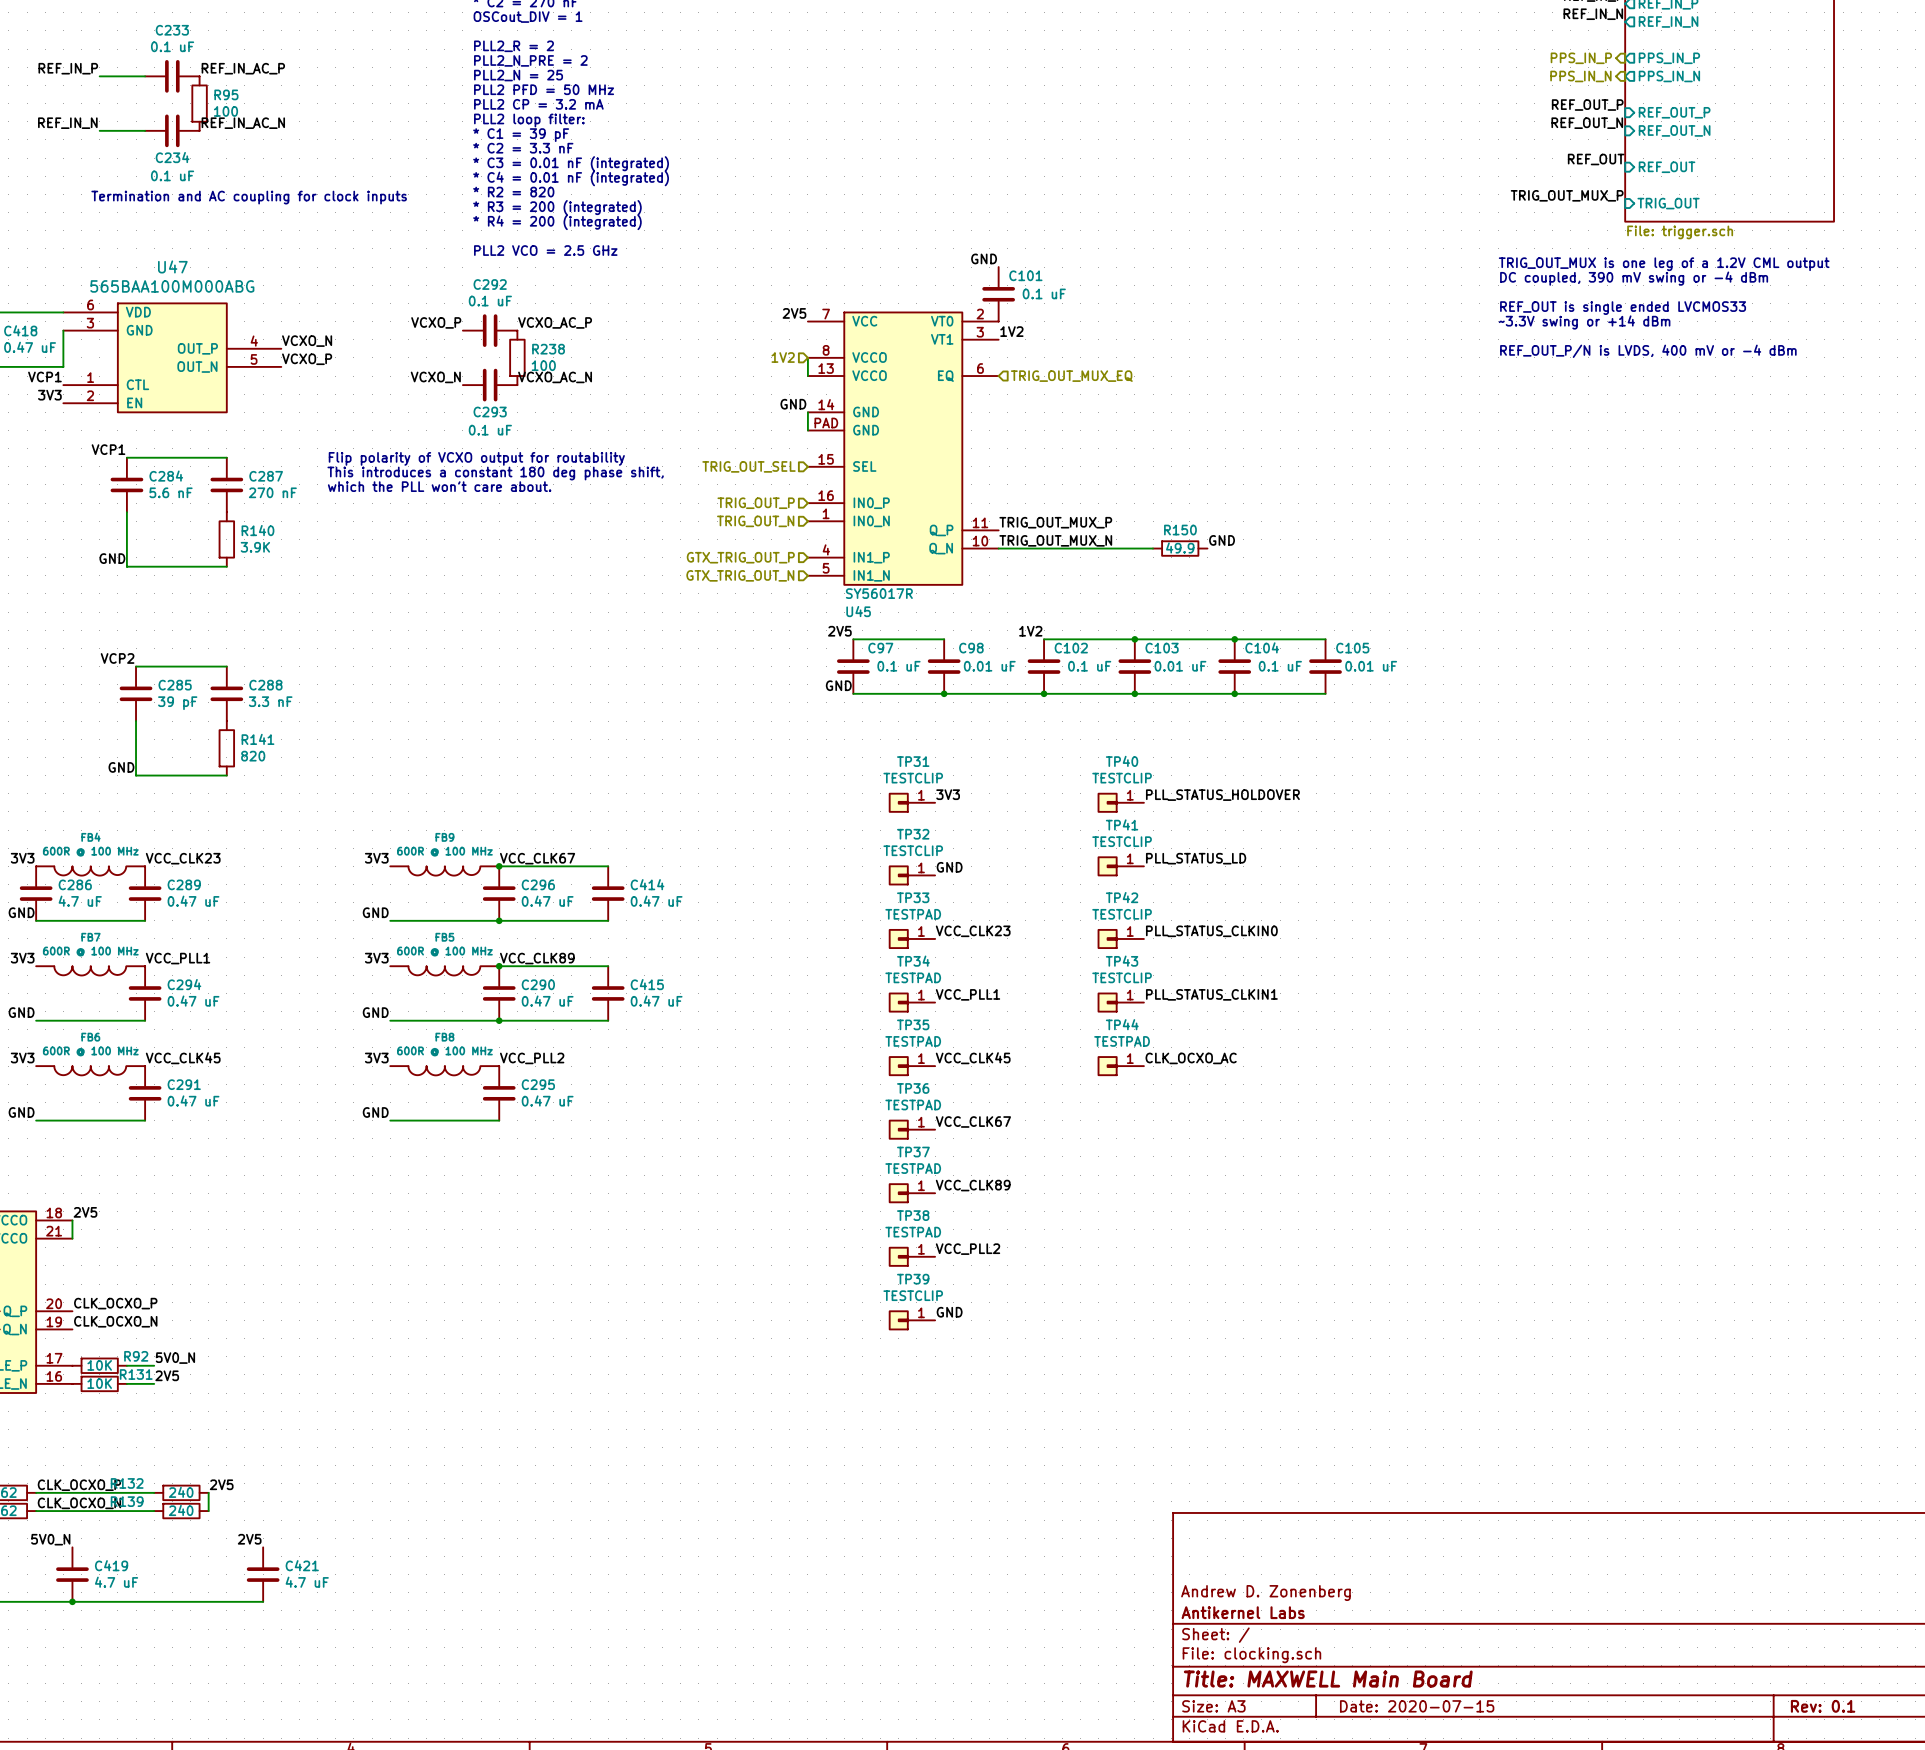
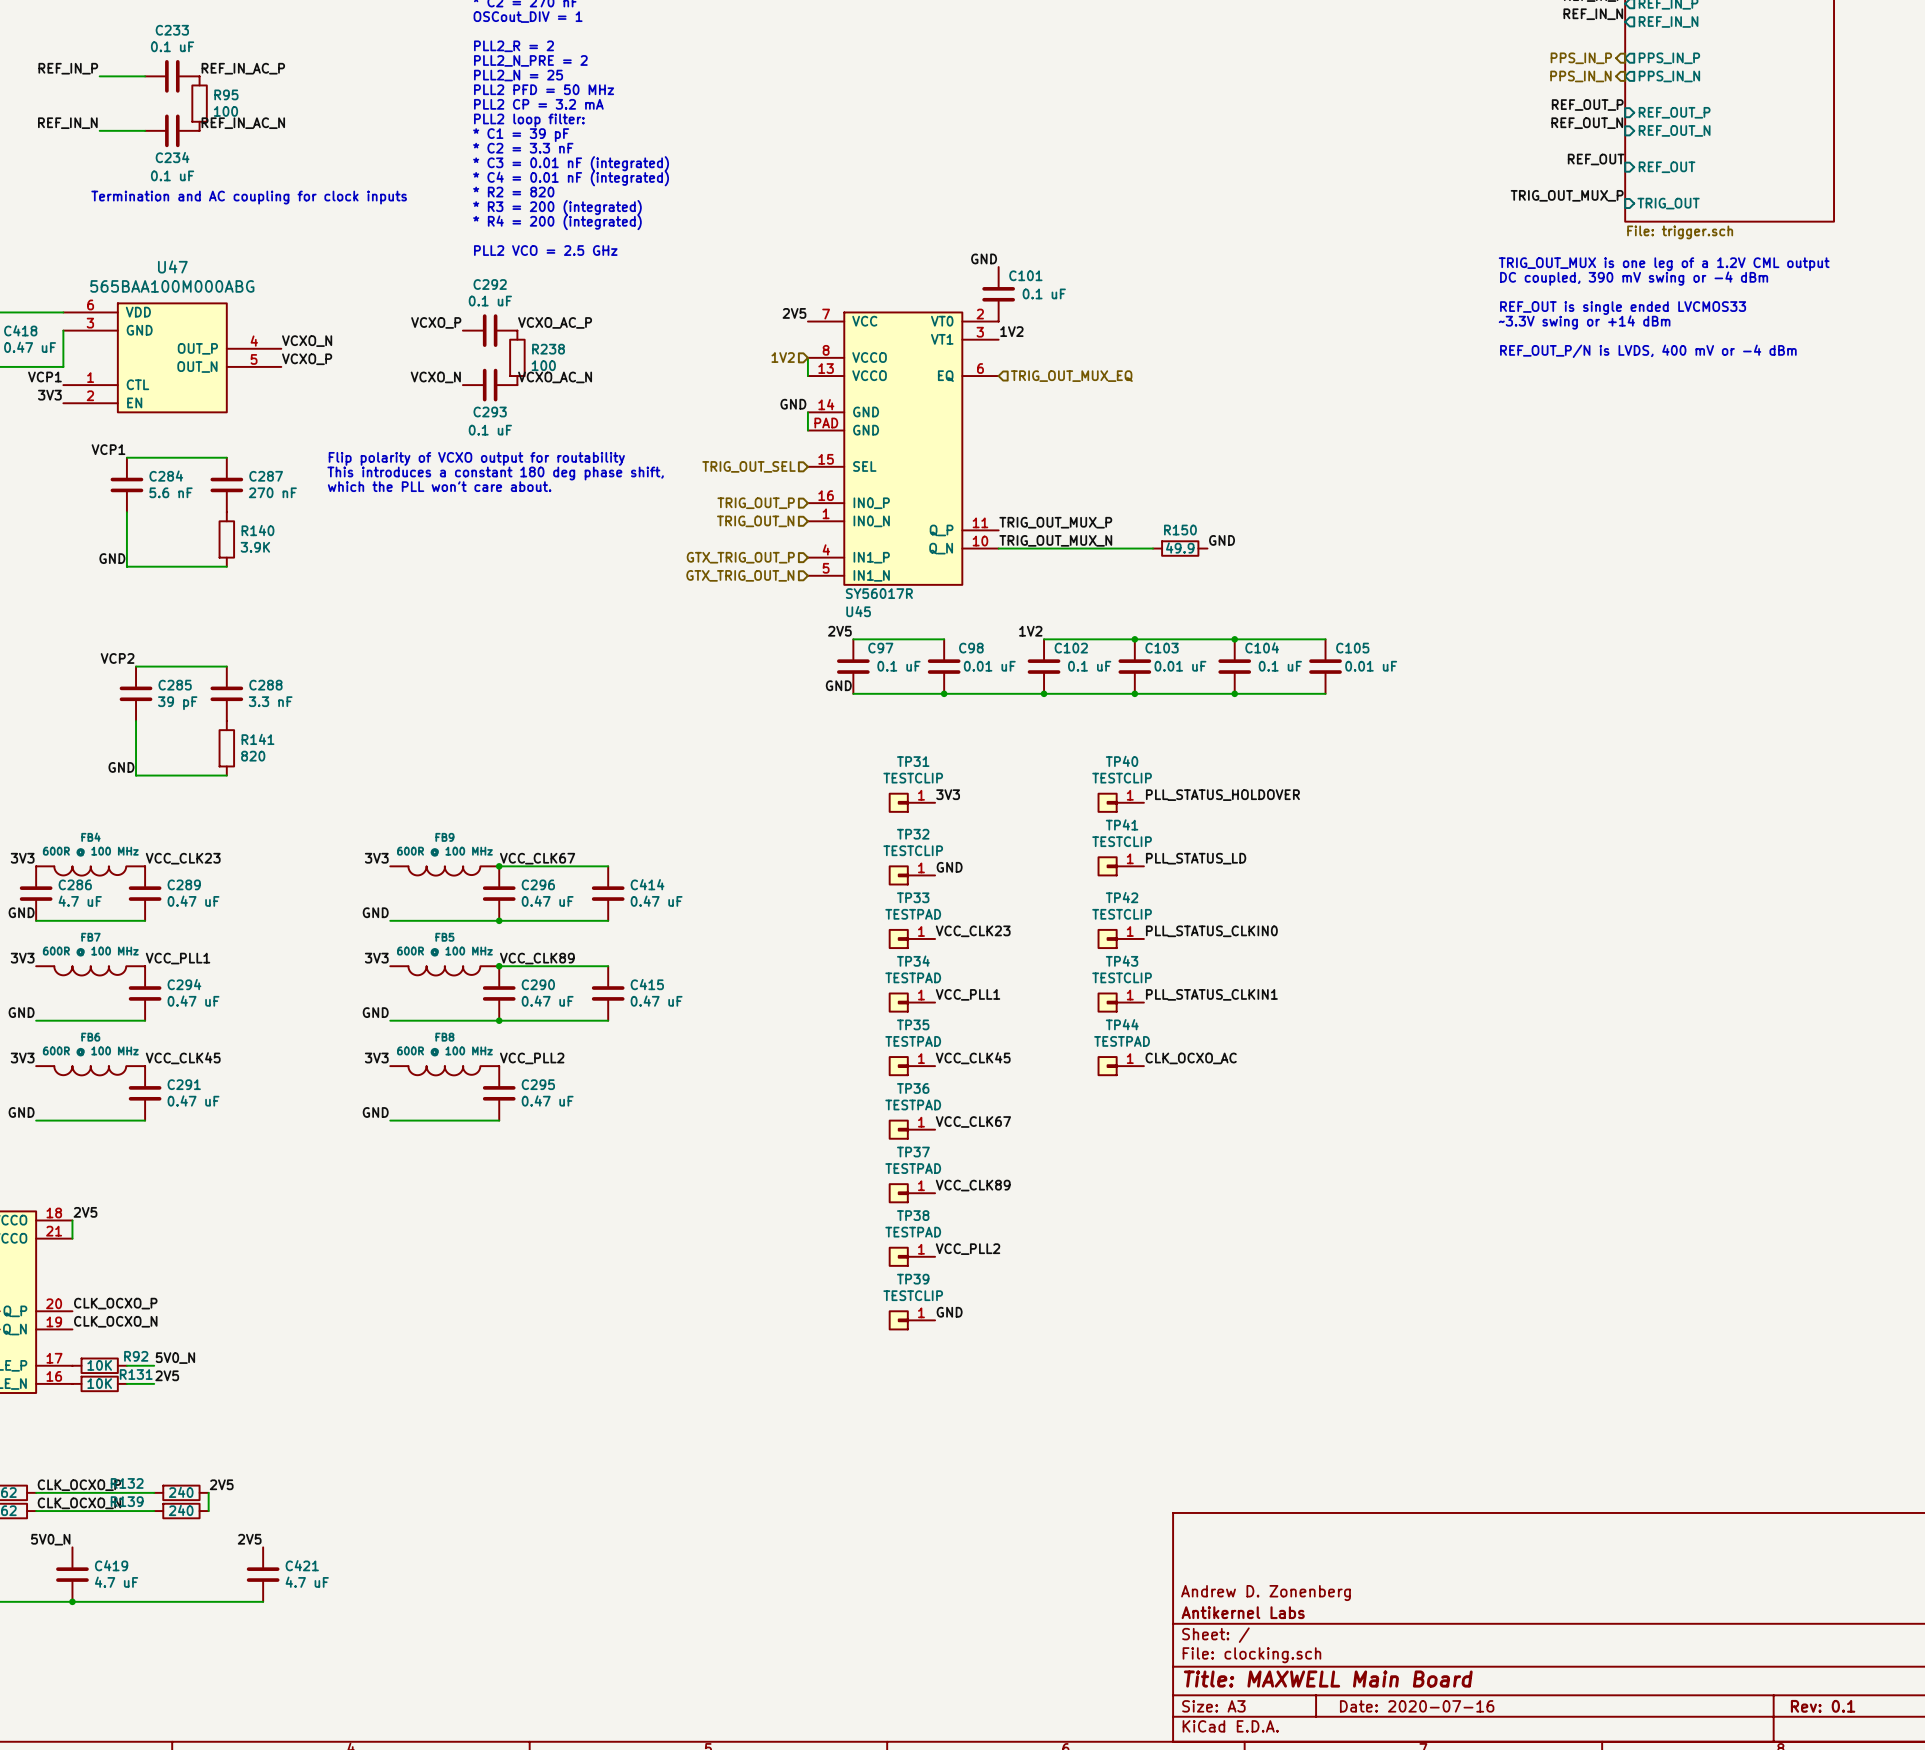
title block: Date: 2020-07-15 (1417, 1706) -> Date: 2020-07-16 (1417, 1706)

